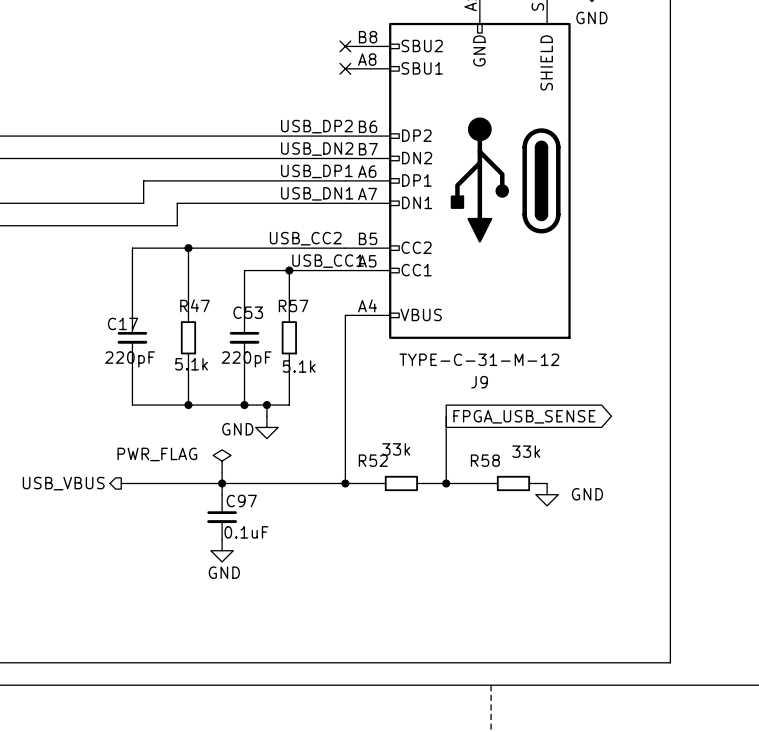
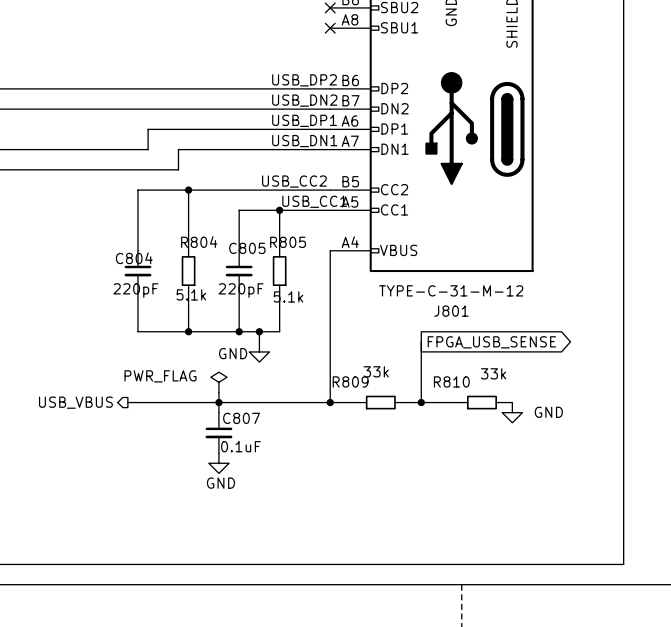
R47 name: R47 (194, 305) -> R804 (199, 242)
R57 name: R57 (293, 306) -> R805 (288, 242)
C53 name: C53 (248, 312) -> C805 (247, 248)
C17 name: C17 (122, 323) -> C804 (134, 258)
J9 name: J9 (479, 382) -> J801 (451, 311)
R52 name: R52 (373, 460) -> R809 (350, 381)
R58 name: R58 (485, 460) -> R810 (451, 381)
C97 name: C97 (241, 501) -> C807 (241, 418)

